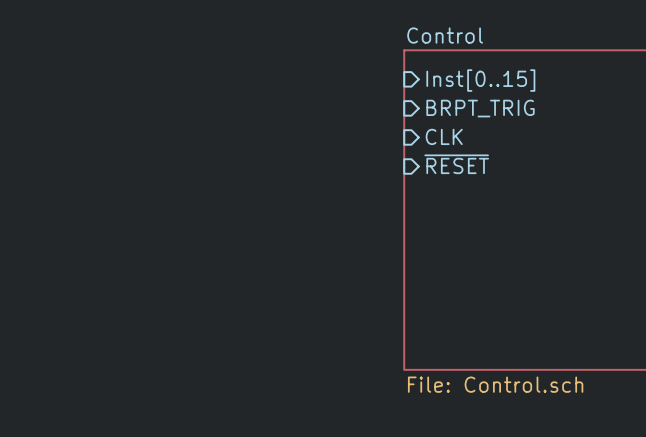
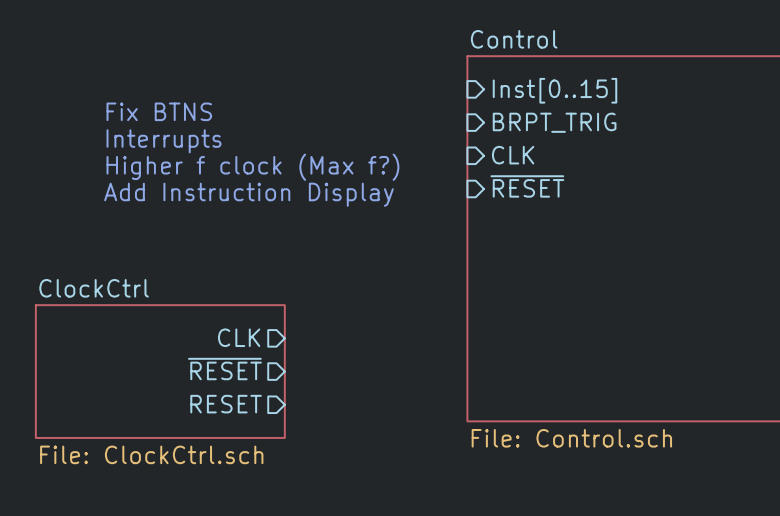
text: none -> Fix BTNS (159, 111)
text: none -> Interrupts (164, 141)
text: none -> Higher f clock (Max f?) (252, 167)
text: none -> Add Instruction Display (248, 194)
sheet pin: none -> CLK (239, 337)
sheet pin: none -> ~{RESET} (224, 369)
sheet ClockCtrl: none -> File: ClockCtrl.sch (160, 371)
sheet pin: none -> RESET (226, 404)

